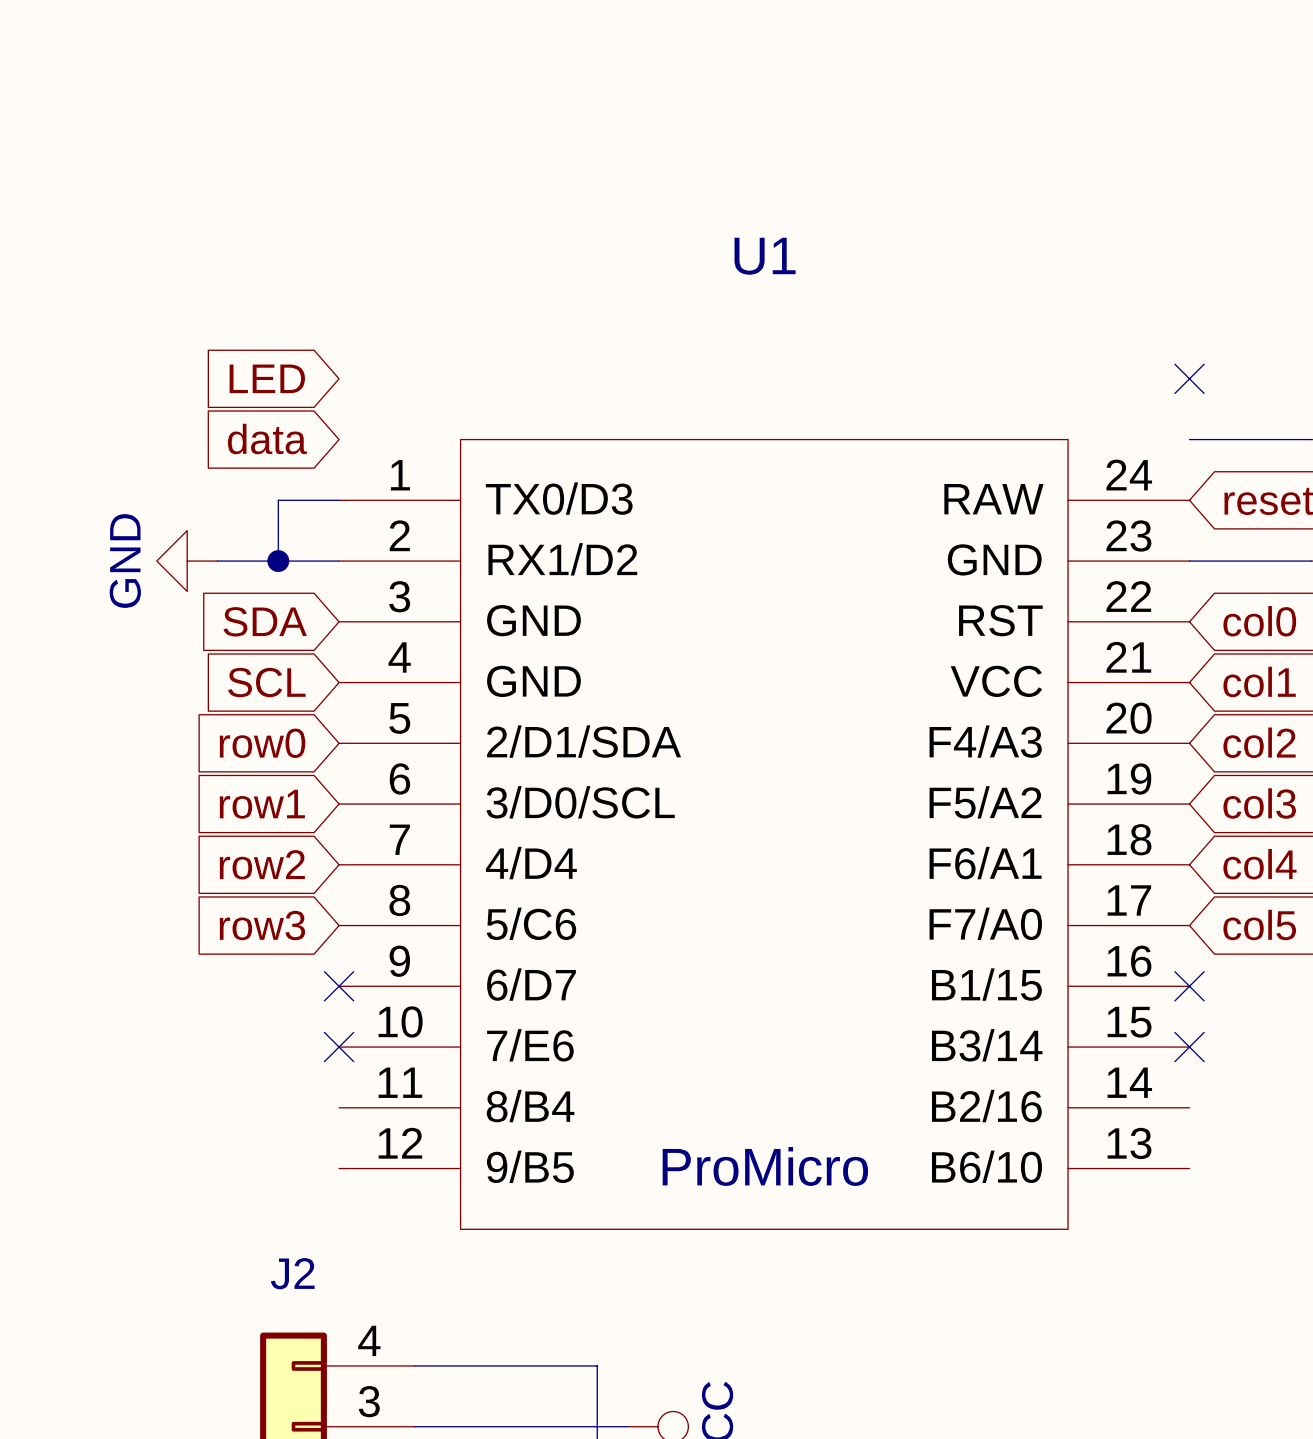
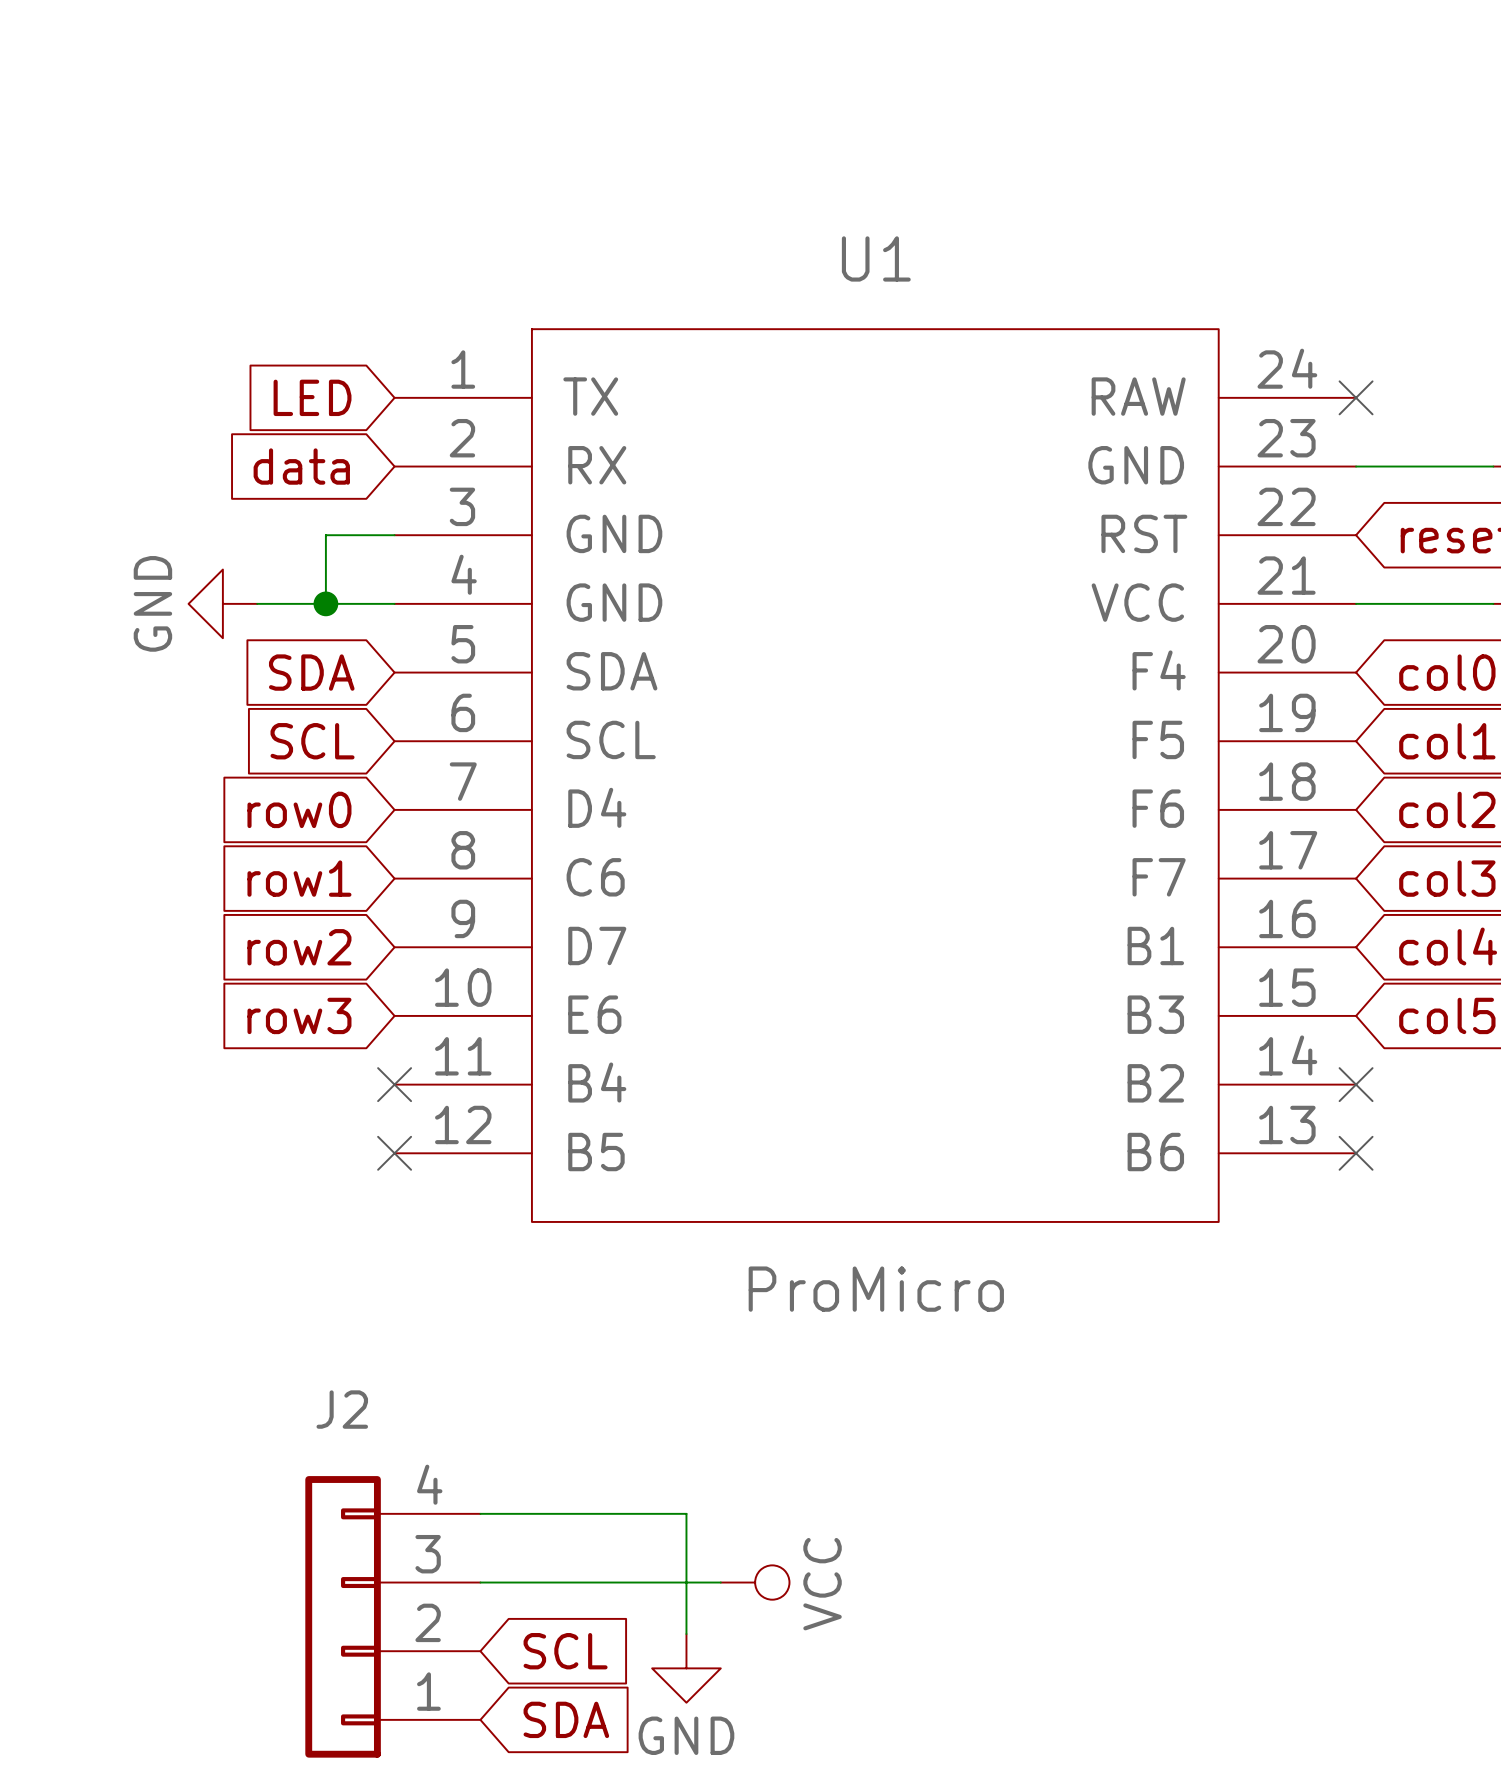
U1 symbol: [339, 439, 1190, 1230] -> [394, 329, 1357, 1222]

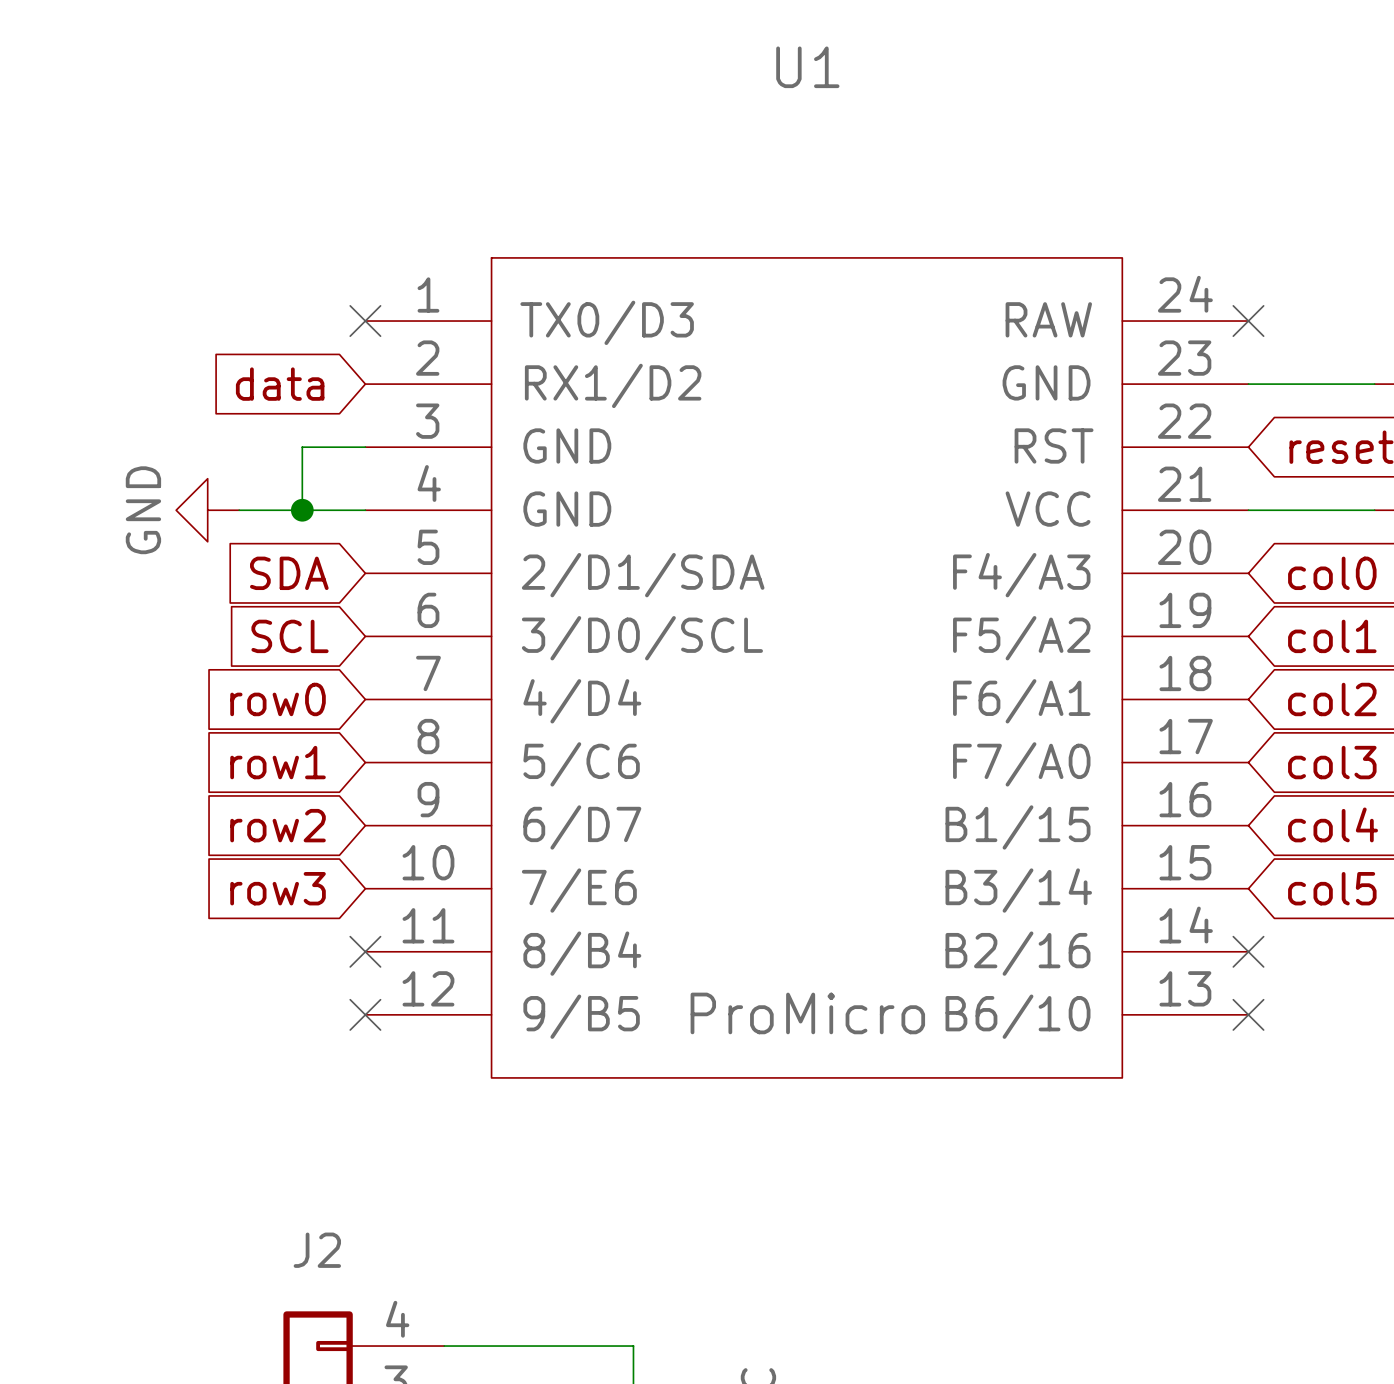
U1 name position: U1 (876, 258) -> U1 (807, 67)
U1 symbol: [394, 329, 1357, 1222] -> [365, 257, 1249, 1078]
global label: LED (312, 397) -> none
no-connect mark: none -> (365, 321)
U1 value position: ProMicro (876, 1289) -> ProMicro (807, 1013)

